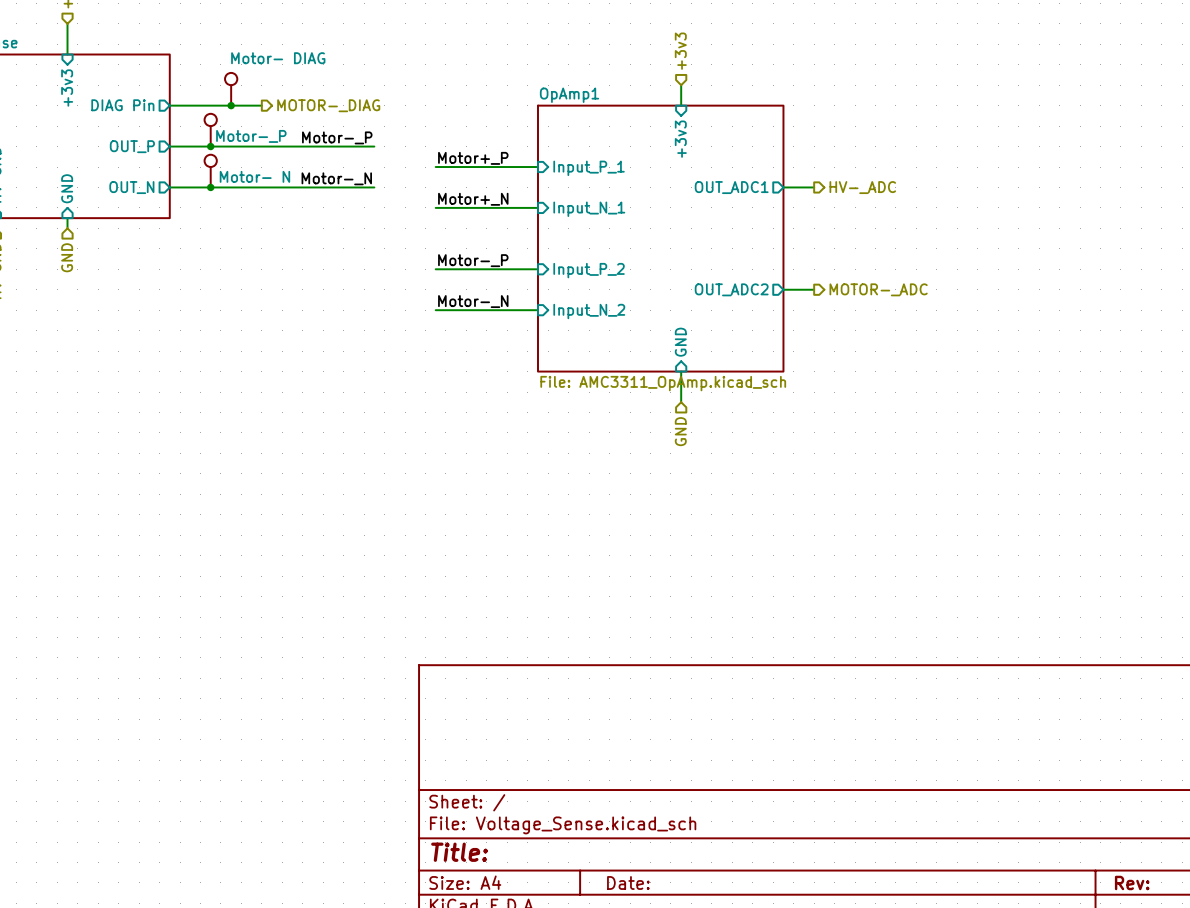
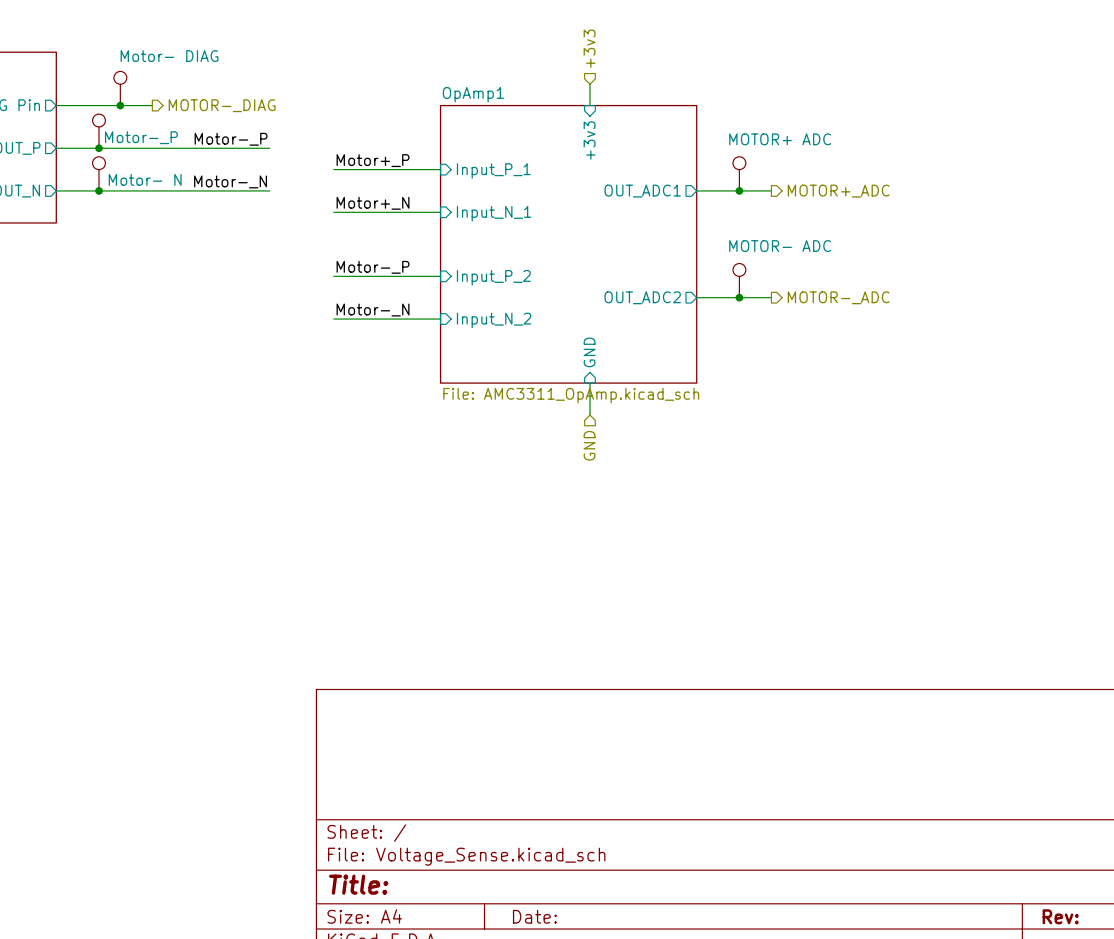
part: none -> MOTOR+ ADC (739, 173)
wire: none -> (728, 190) (771, 190)
junction: none -> (739, 190)
hierarchical label: HV-_ADC (862, 187) -> none
hierarchical label: none -> MOTOR+_ADC (838, 191)
part: none -> MOTOR- ADC (739, 280)
wire: none -> (728, 297) (771, 297)
junction: none -> (739, 297)
hierarchical label position: MOTOR-_ADC (878, 289) -> MOTOR-_ADC (838, 297)

